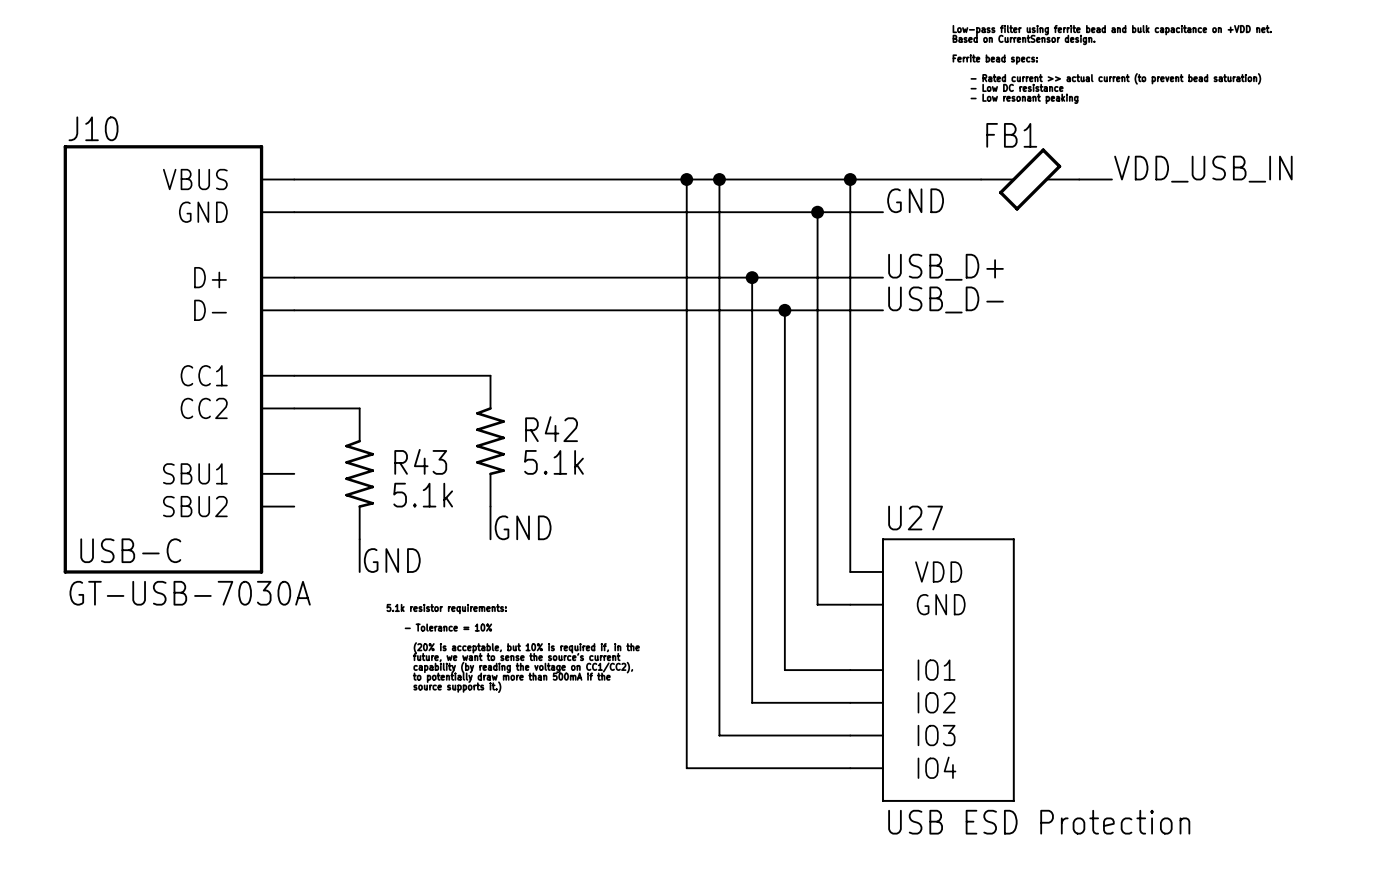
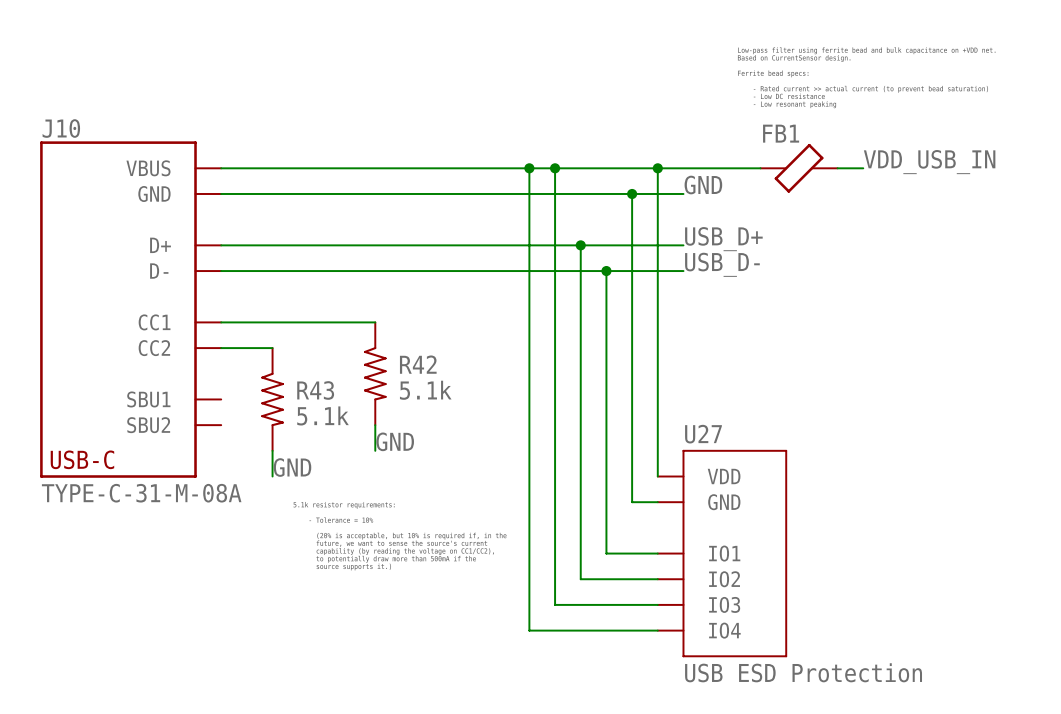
J10 text: GT-USB-7030A (190, 593) -> TYPE-C-31-M-08A (141, 493)

